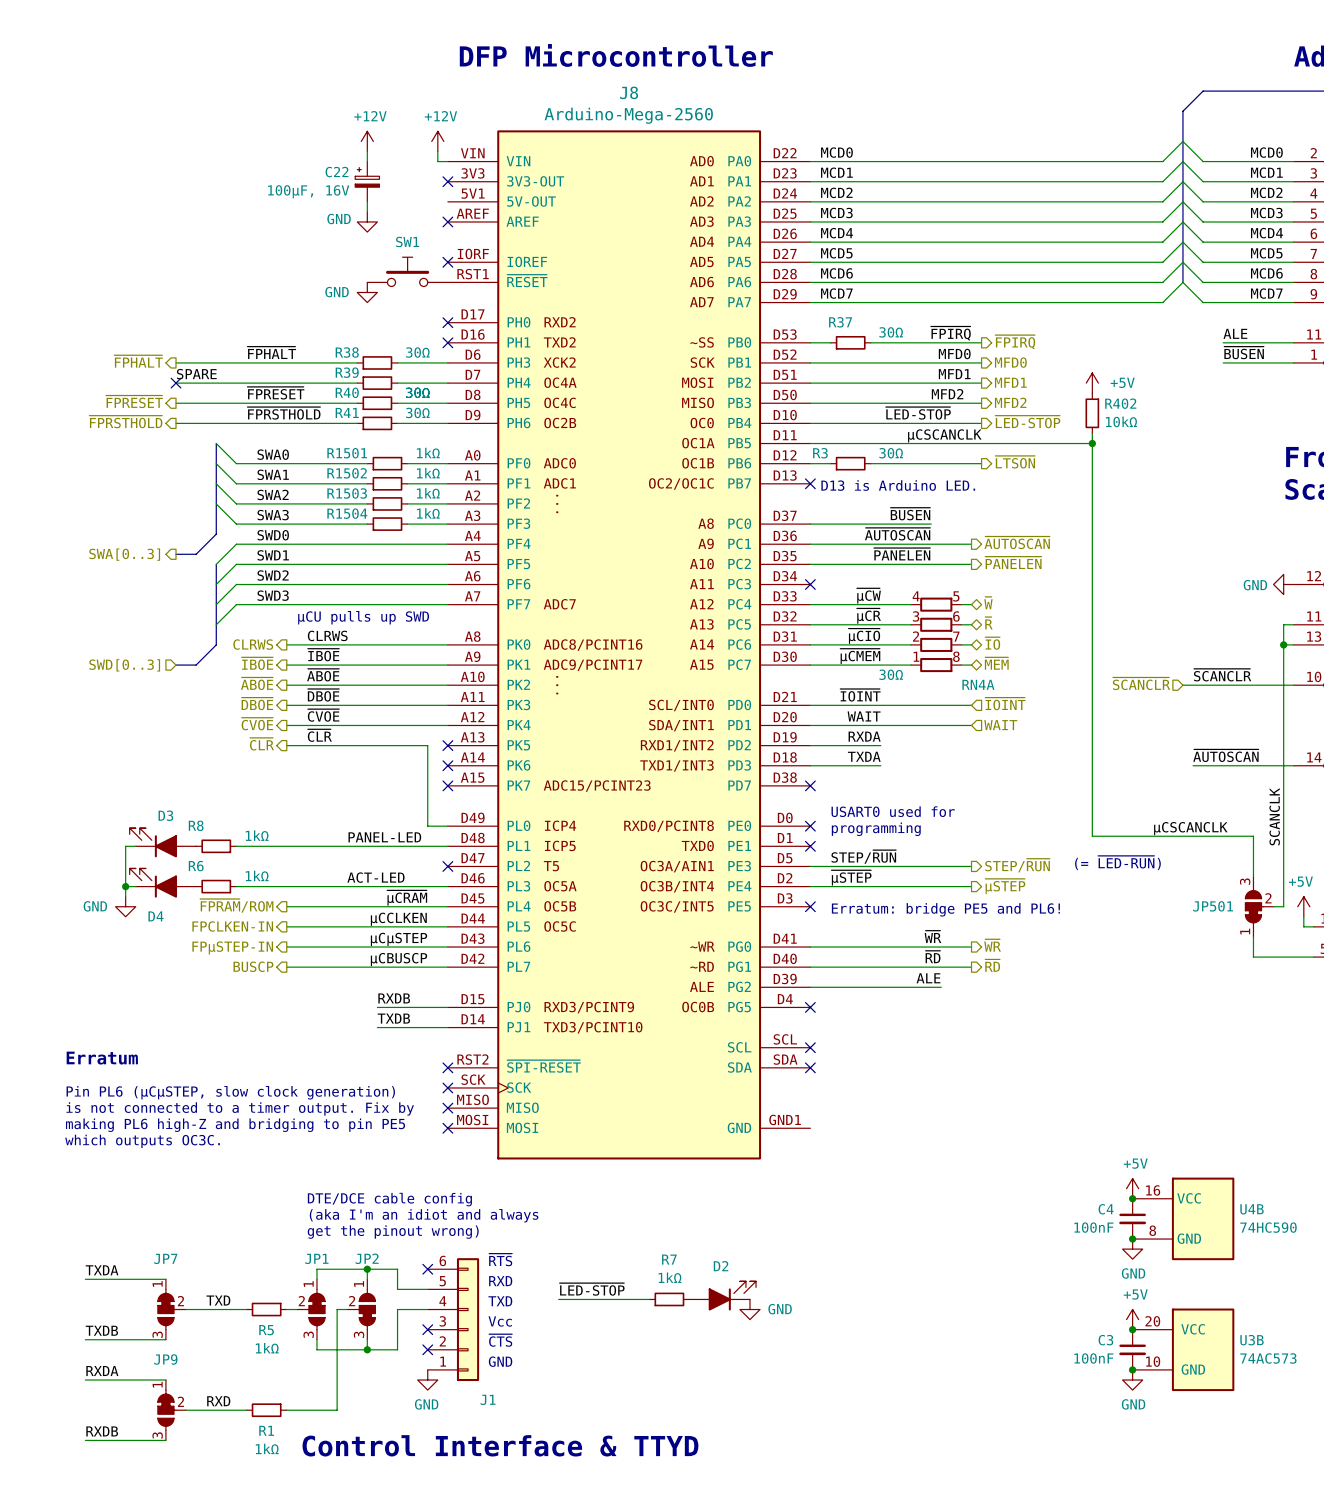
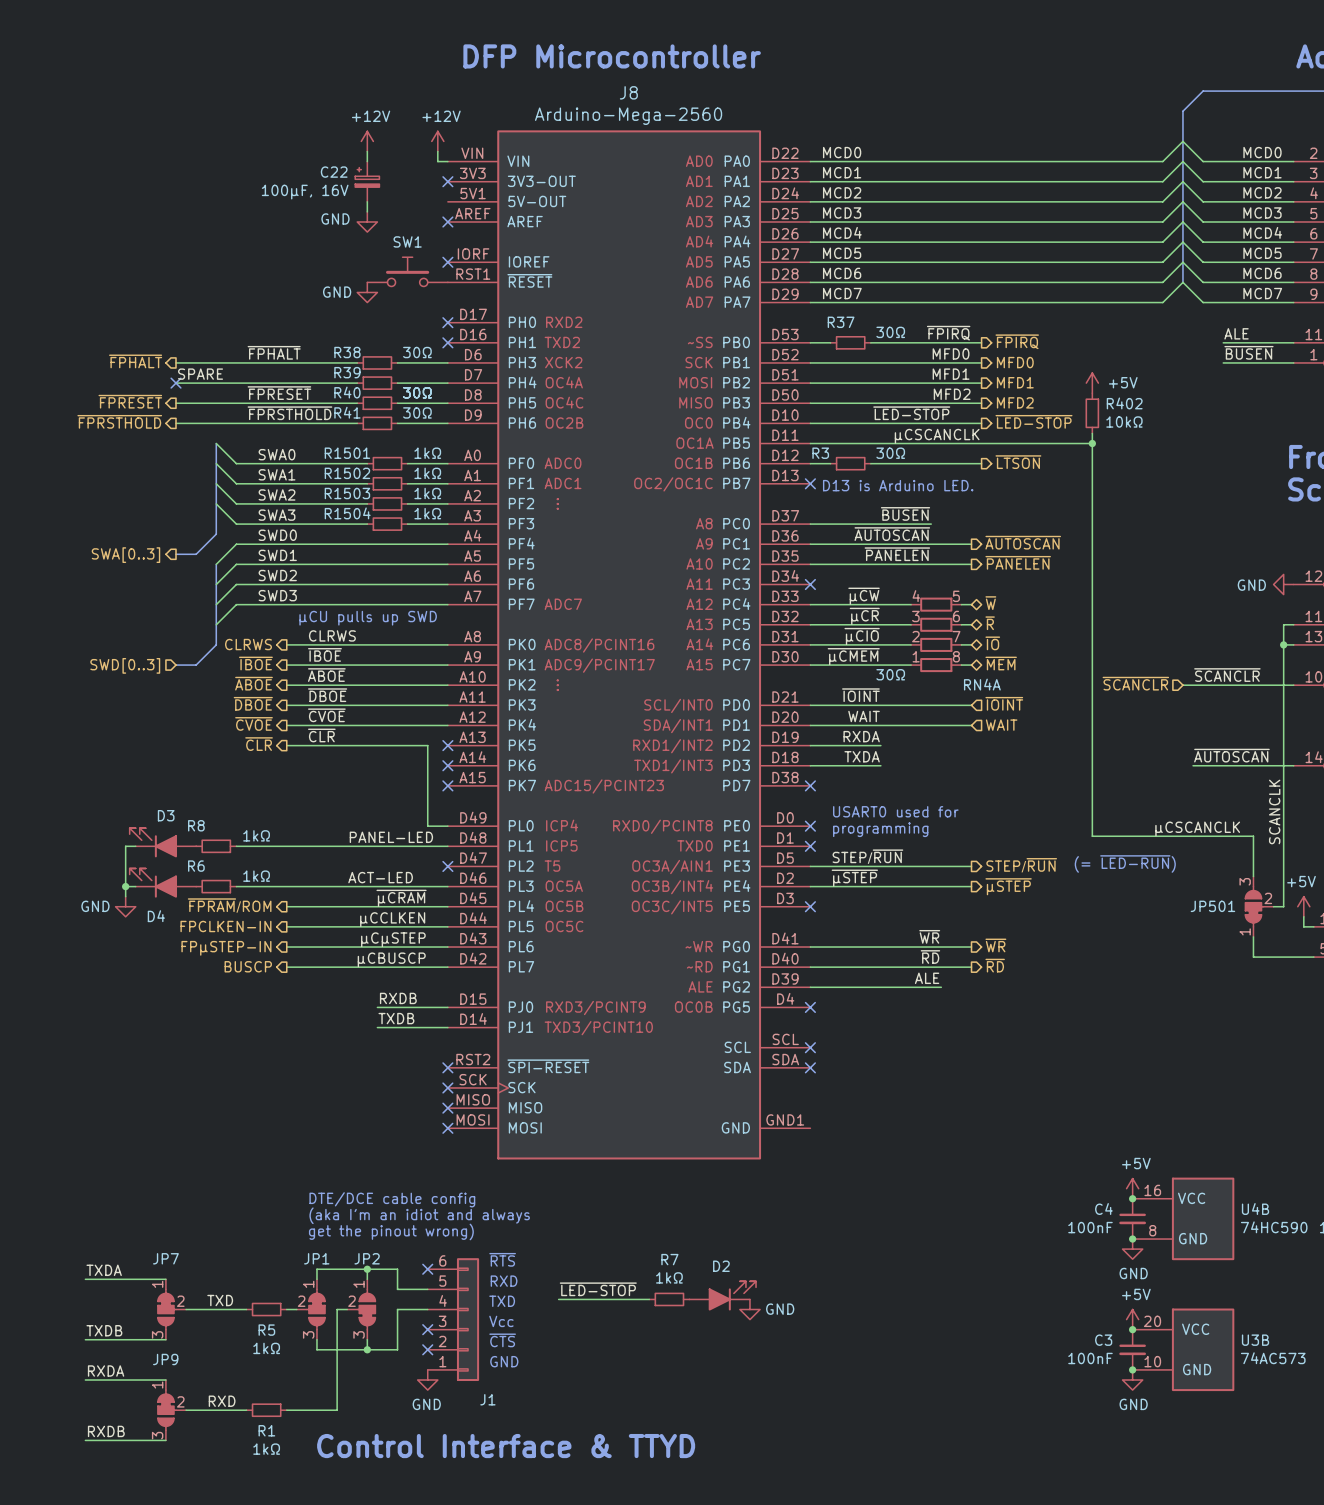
text: Erratum: bridge PE5 and PL6! (945, 909) -> none
text: Erratum (102, 1058) -> none
text: Pin PL6 (µCµSTEP, slow clock generation) (230, 1092) -> none
text: is not connected to a timer output. Fix by (240, 1108) -> none
text: making PL6 high-Z and bridging to pin PE5 (235, 1125) -> none
text: which outputs OC3C. (142, 1141) -> none

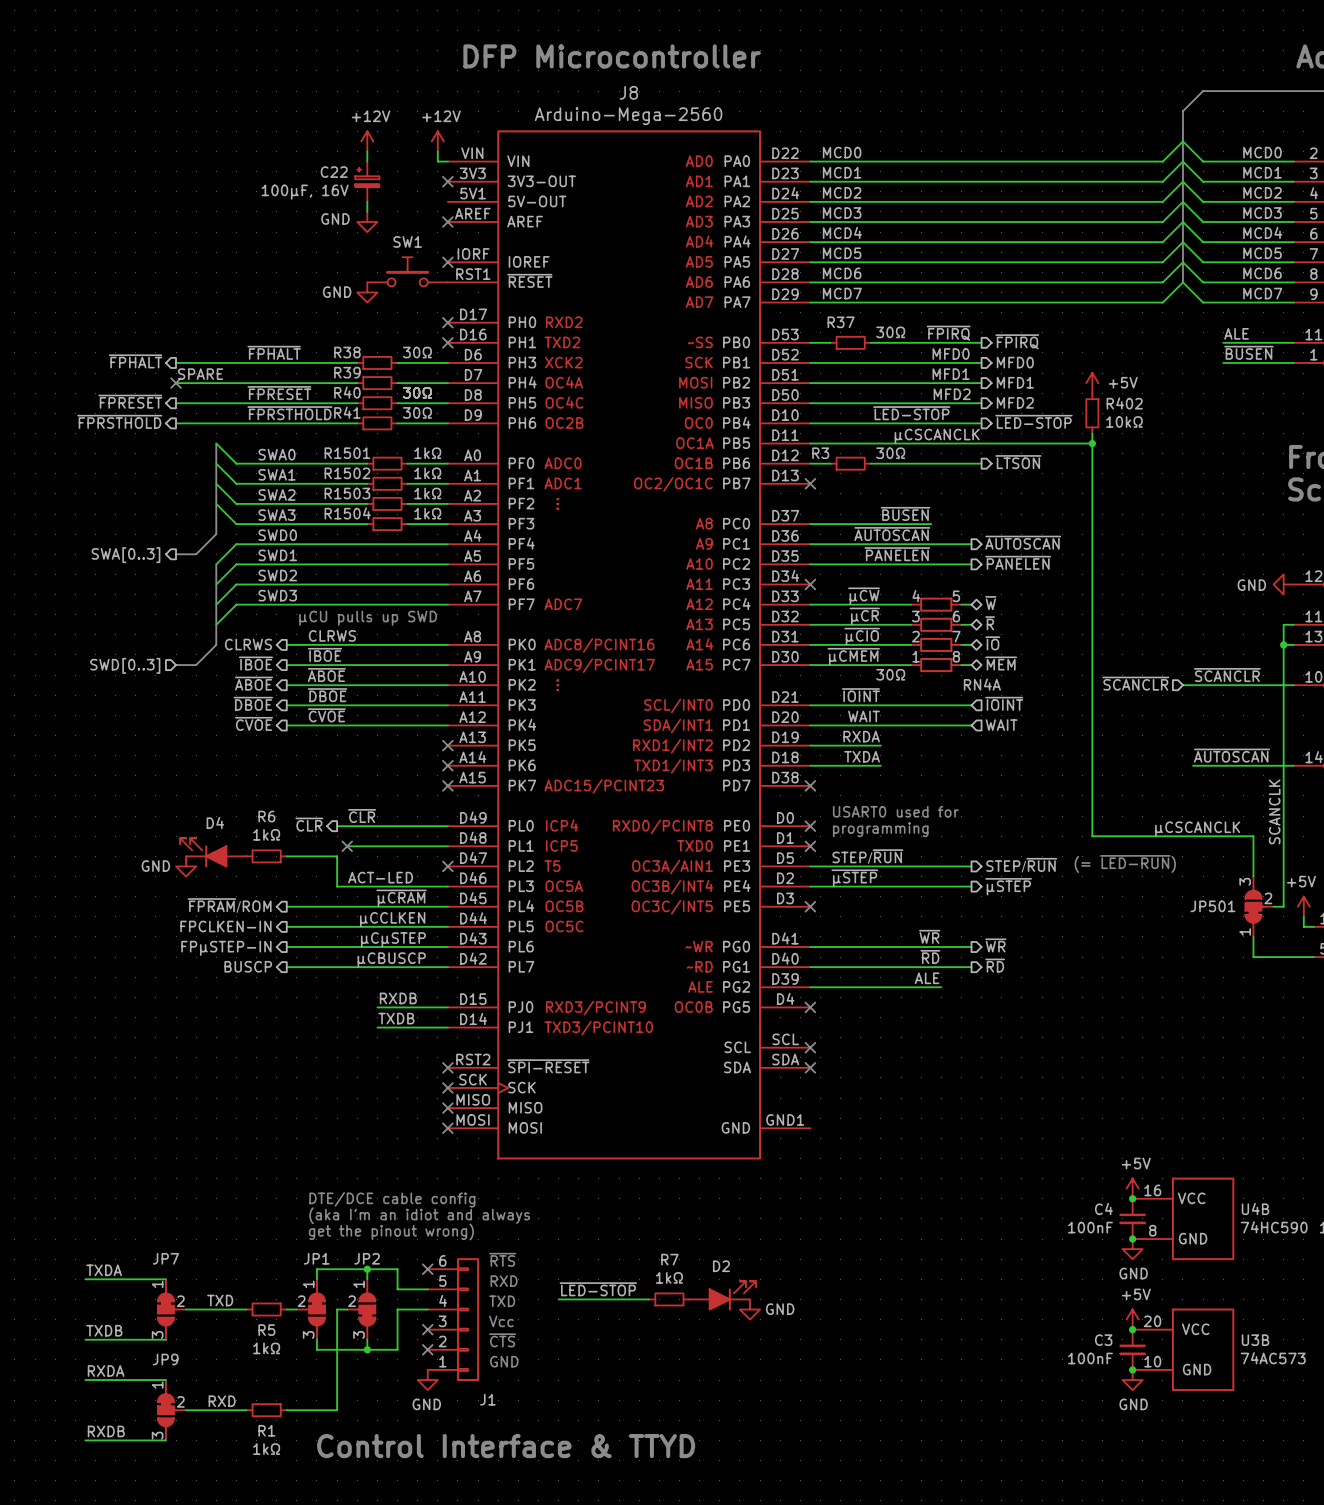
text: D13 is Arduino LED. (898, 485) -> none
label position: ~{CLR} (321, 735) -> ~{CLR} (362, 816)
hierarchical label position: ~{CLR} (259, 744) -> ~{CLR} (309, 824)
wire: (286, 745) (427, 745) (427, 826) -> (337, 826) (427, 826)
label: PANEL-LED (391, 837) -> none
D3: (162, 842) -> none
wire: (135, 846) (125, 846) (125, 896) -> none
R8: 1kΩ (216, 846) -> none
wire: (236, 846) (347, 846) -> none
no-connect mark: none -> (347, 846)
R6 name position: R6 (196, 866) -> R6 (266, 816)
R6 value position: 1kΩ (256, 876) -> 1kΩ (266, 834)
D4 position: (162, 883) -> (213, 852)
wire: (125, 886) (135, 886) -> none
junction: (125, 886) -> none
R6 position: (216, 886) -> (266, 856)
wire: (236, 886) (337, 886) -> (286, 856) (337, 856) (337, 886)
power symbol position: GND (125, 906) -> GND (186, 866)
D4 name position: D4 (156, 916) -> D4 (215, 822)

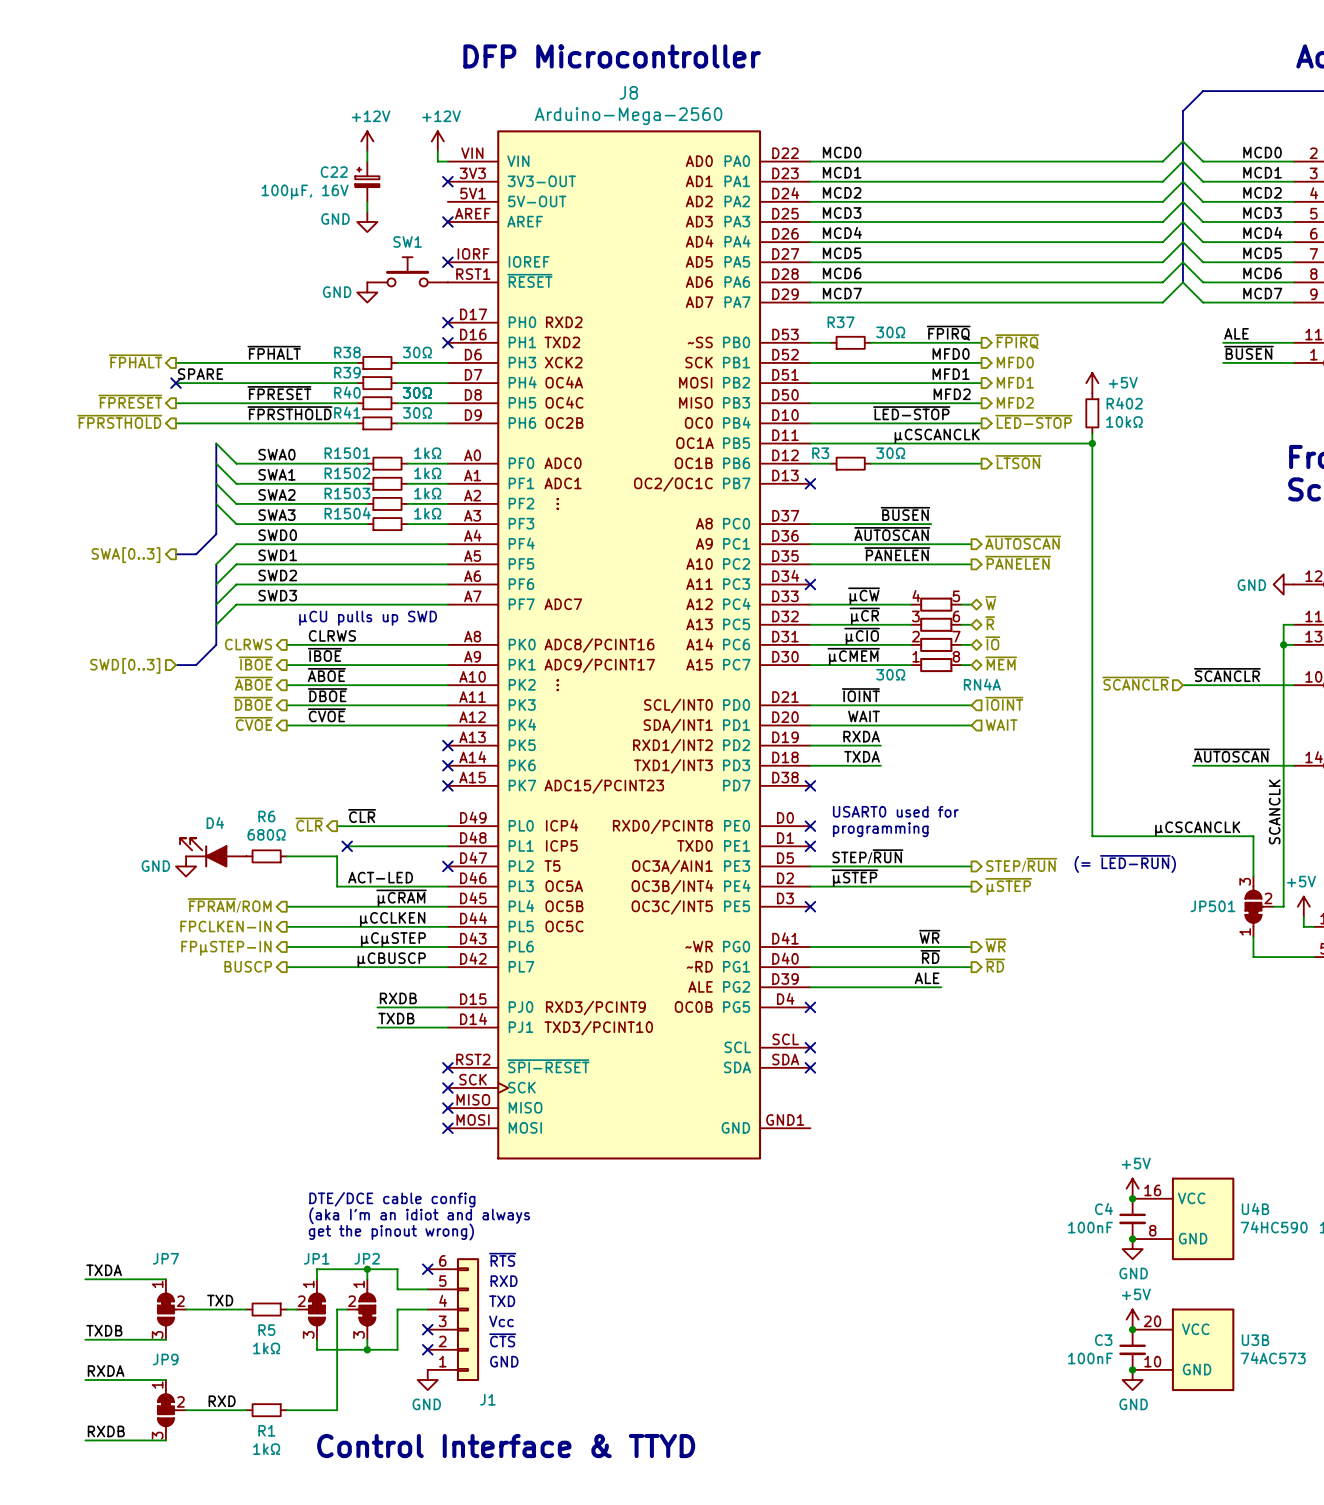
R6 value: 1kΩ (266, 834) -> 680Ω (266, 834)
label: ~{LED-STOP} (598, 1289) -> none
D2: (722, 1295) -> none
wire: (558, 1299) (649, 1299) -> none
R7: 1kΩ (669, 1299) -> none
power symbol: GND (749, 1309) -> none

